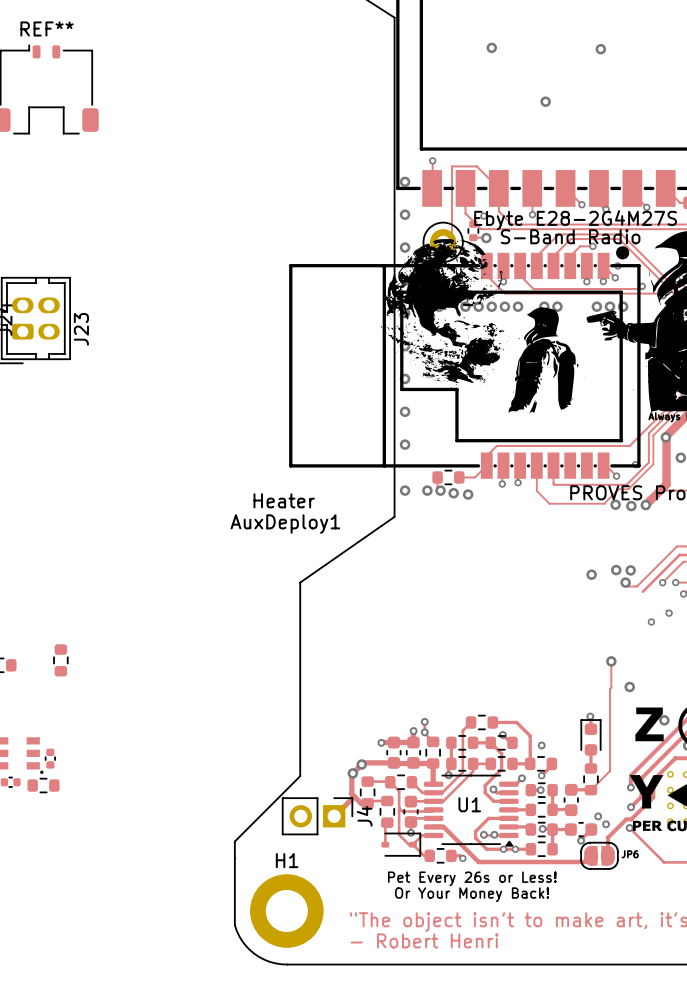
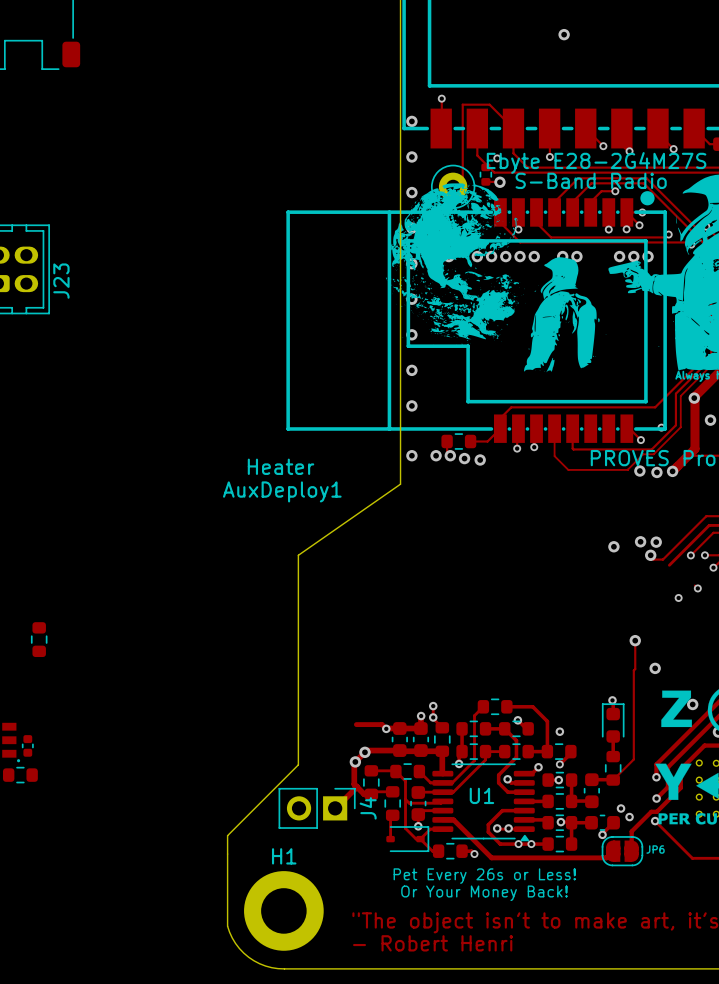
track: none -> (356, 724) (382, 724) (386, 728)

